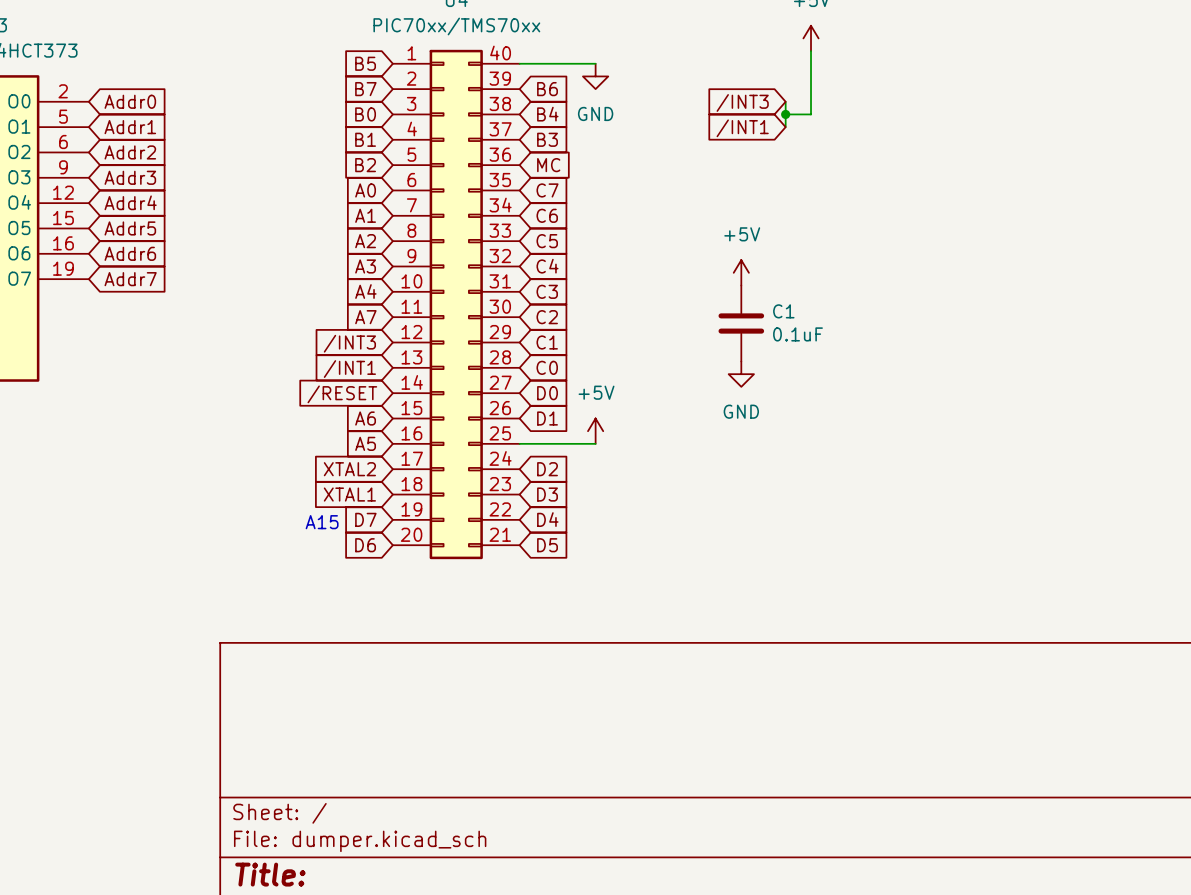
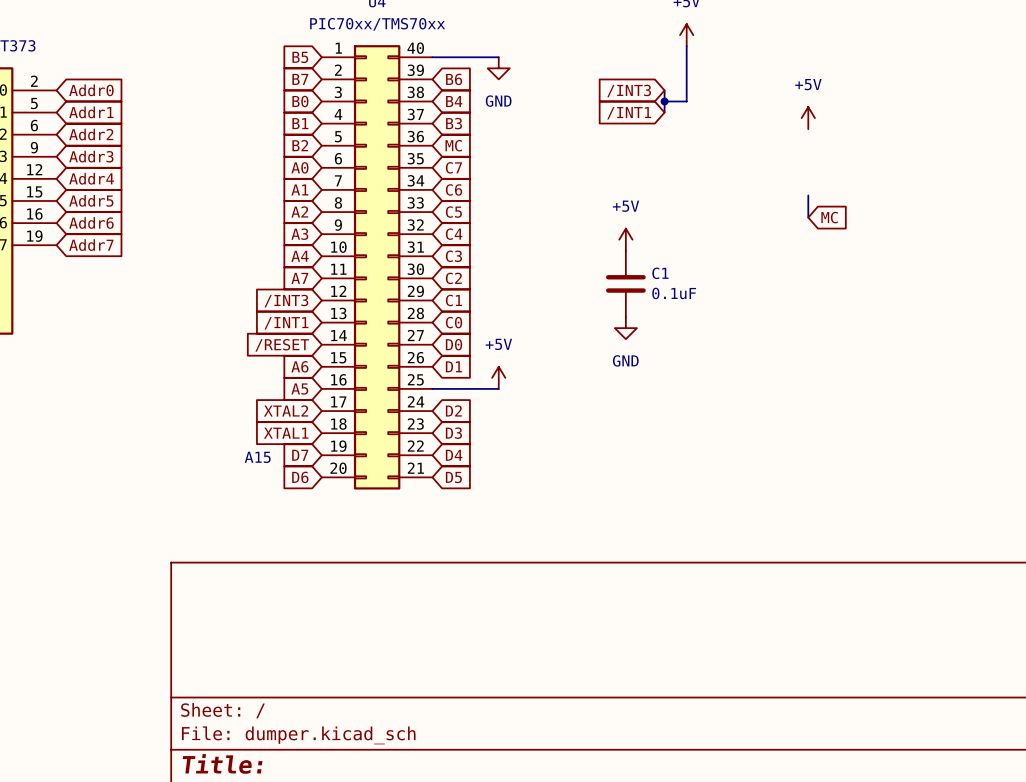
power symbol: none -> +5V (808, 118)
wire: none -> (808, 195) (808, 217)
global label: none -> MC (829, 217)

